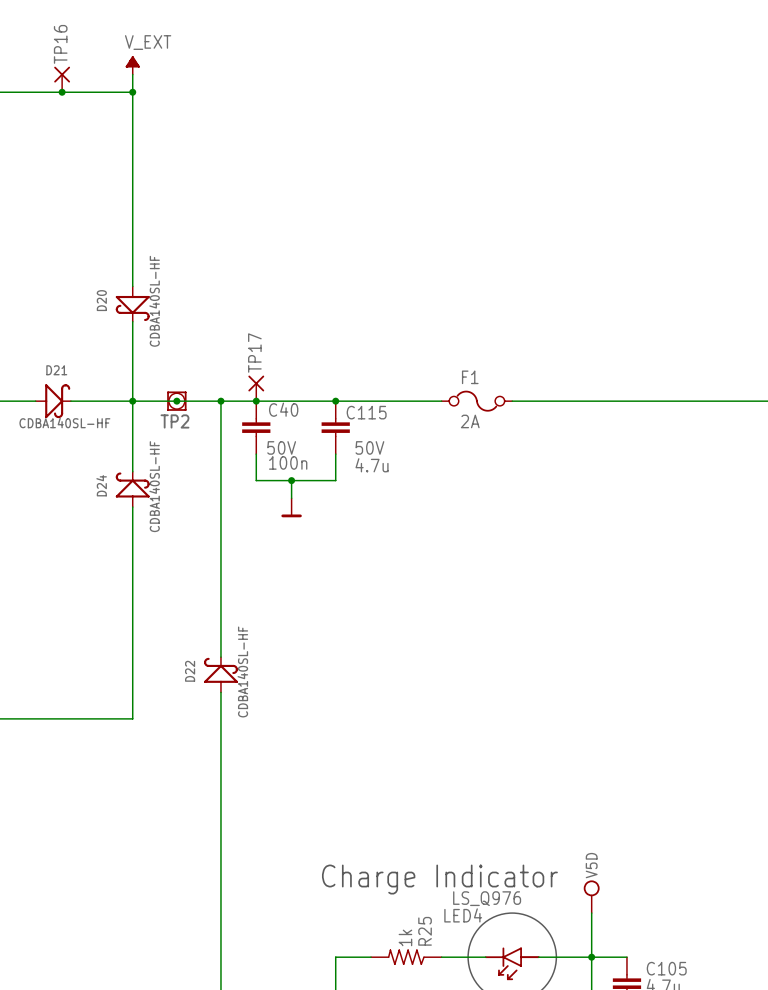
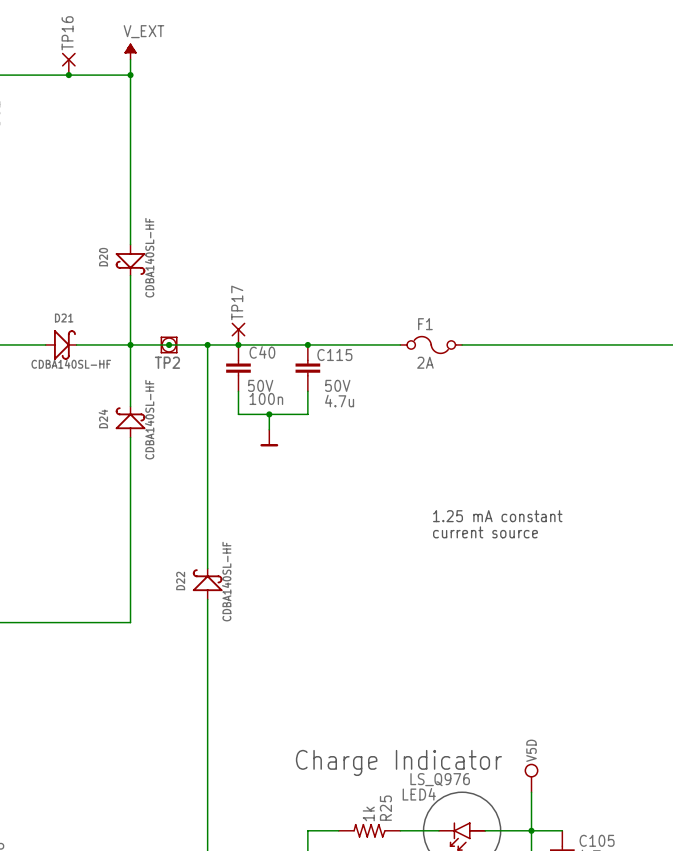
text: none -> 1.25 mA constant (497, 516)
text: none -> current source (485, 532)

